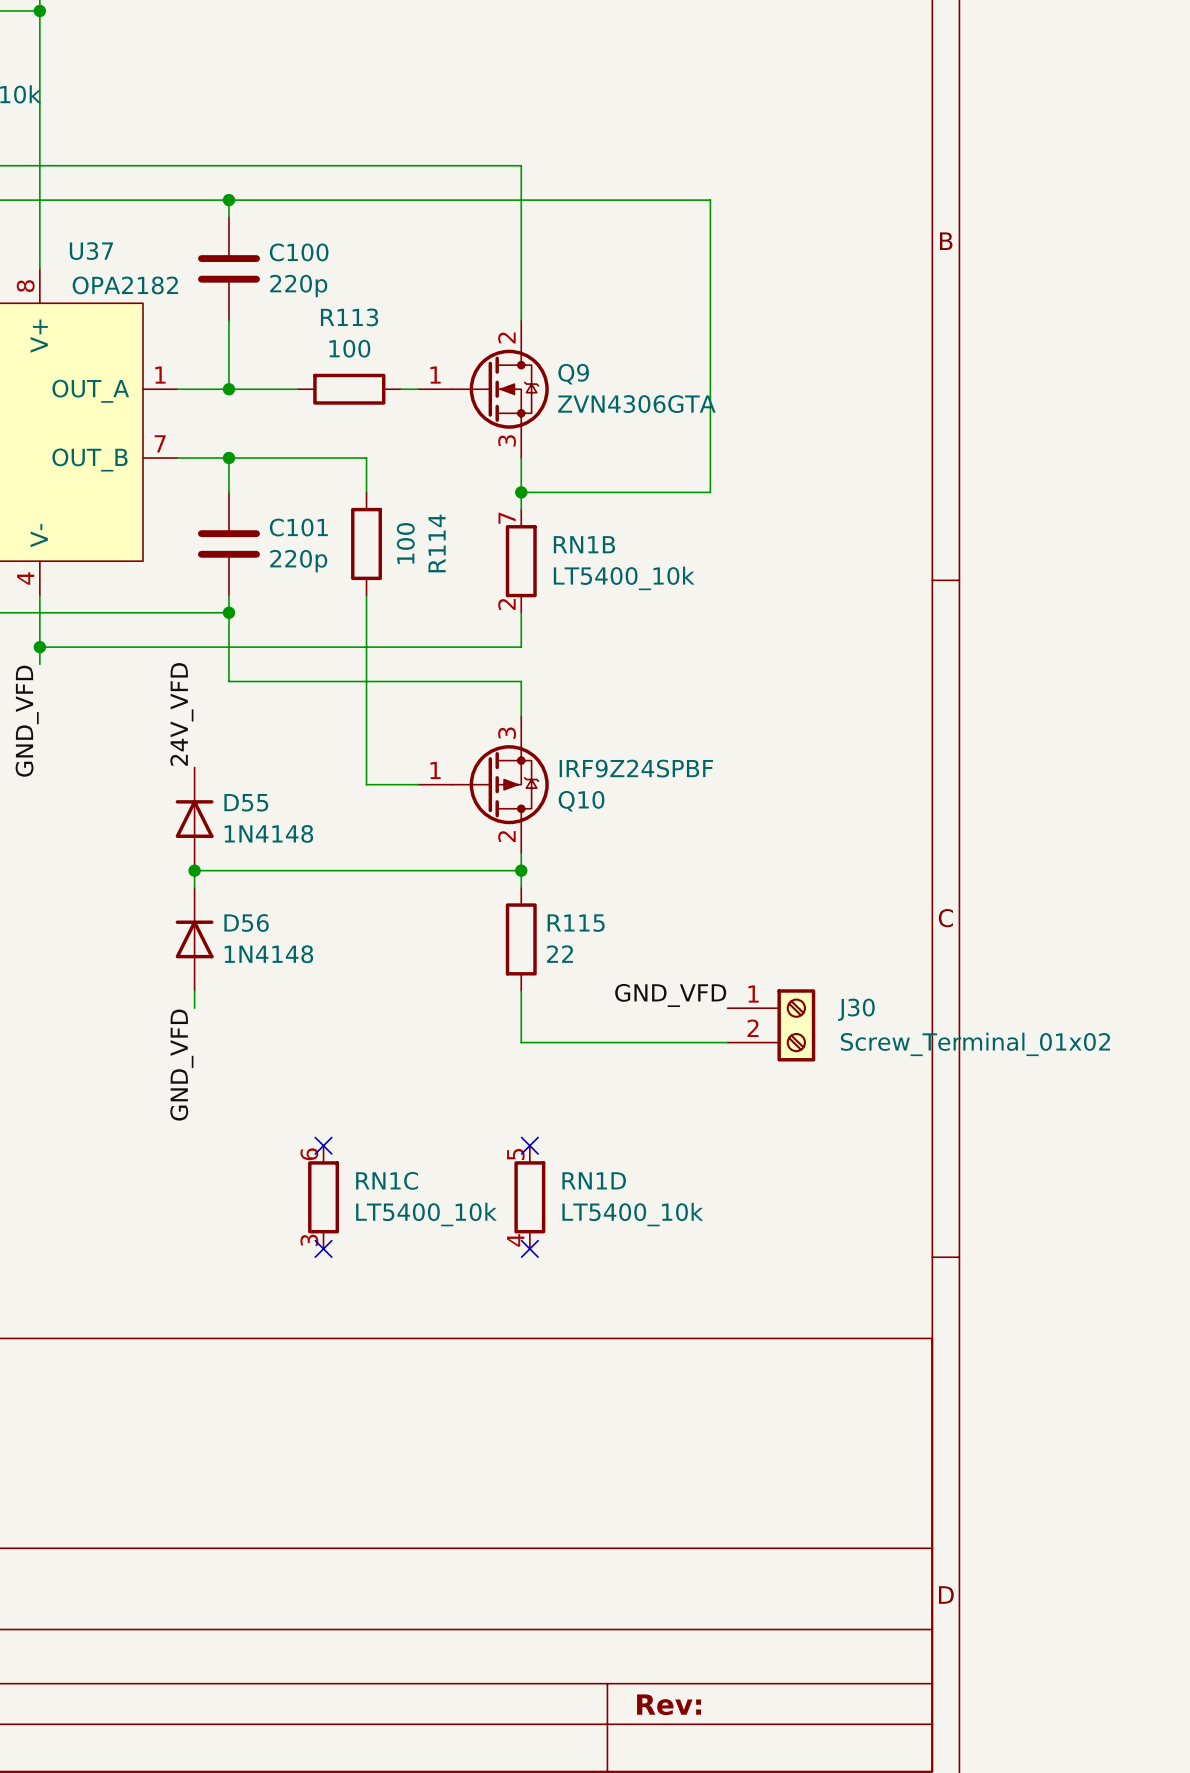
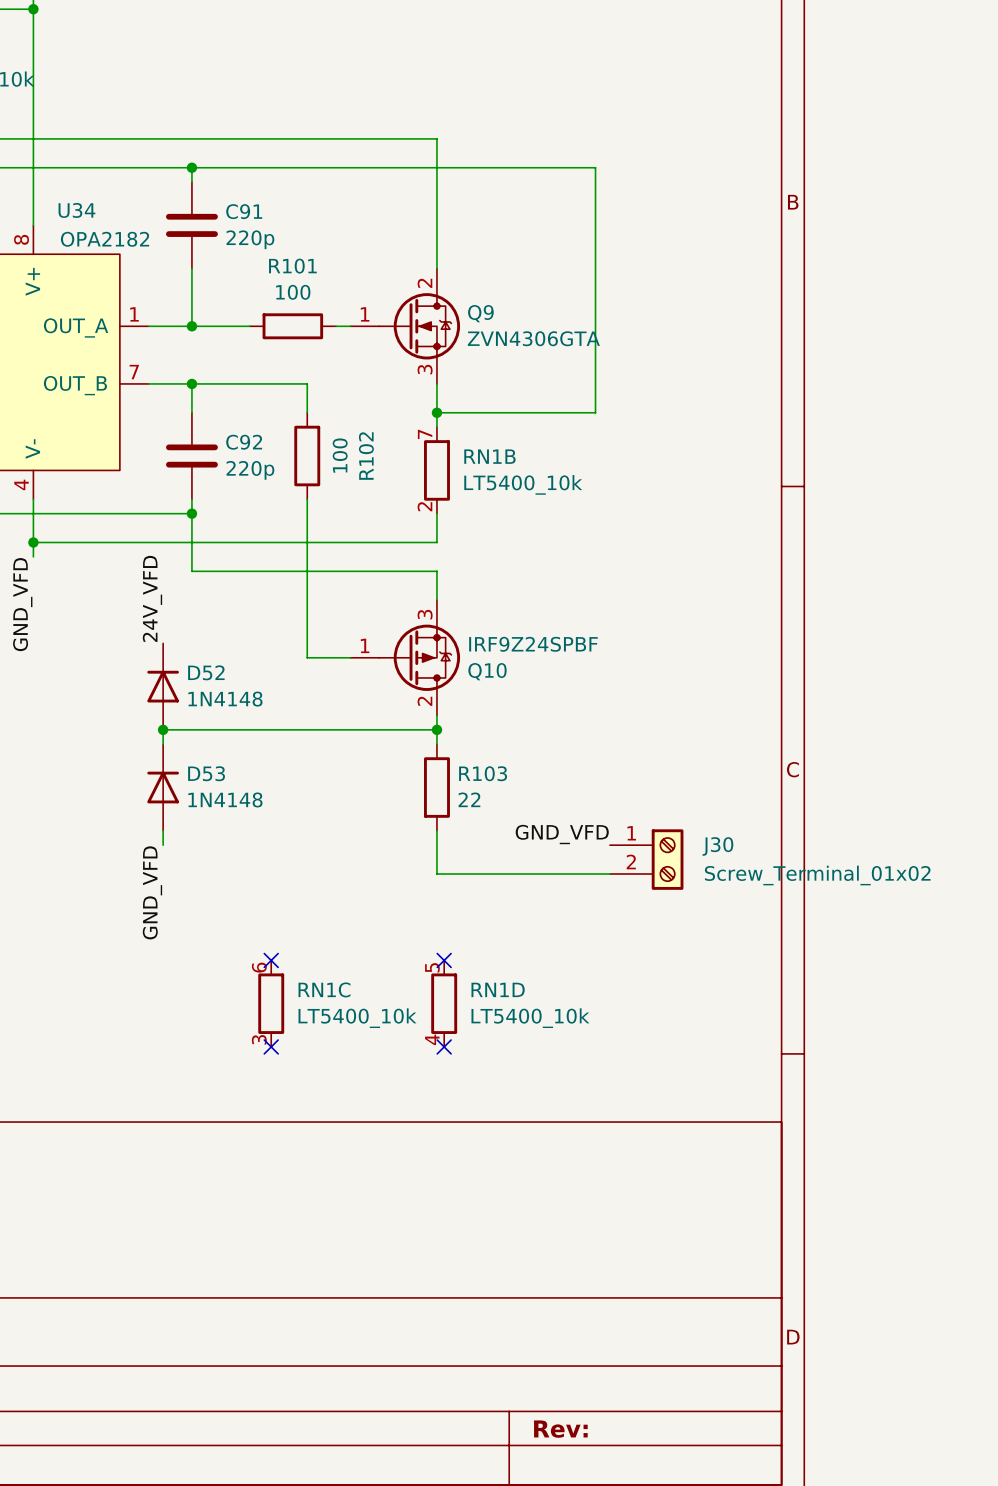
U37 name: U37 (91, 251) -> U34 (76, 210)
C100 name: C100 (299, 252) -> C91 (244, 211)
R113 name: R113 (349, 317) -> R101 (292, 266)
C101 name: C101 (298, 527) -> C92 (244, 442)
R114 name: R114 (437, 543) -> R102 (366, 456)
D55 name: D55 (246, 802) -> D52 (206, 672)
D56 name: D56 (246, 922) -> D53 (206, 773)
R115 name: R115 (576, 923) -> R103 (483, 773)

